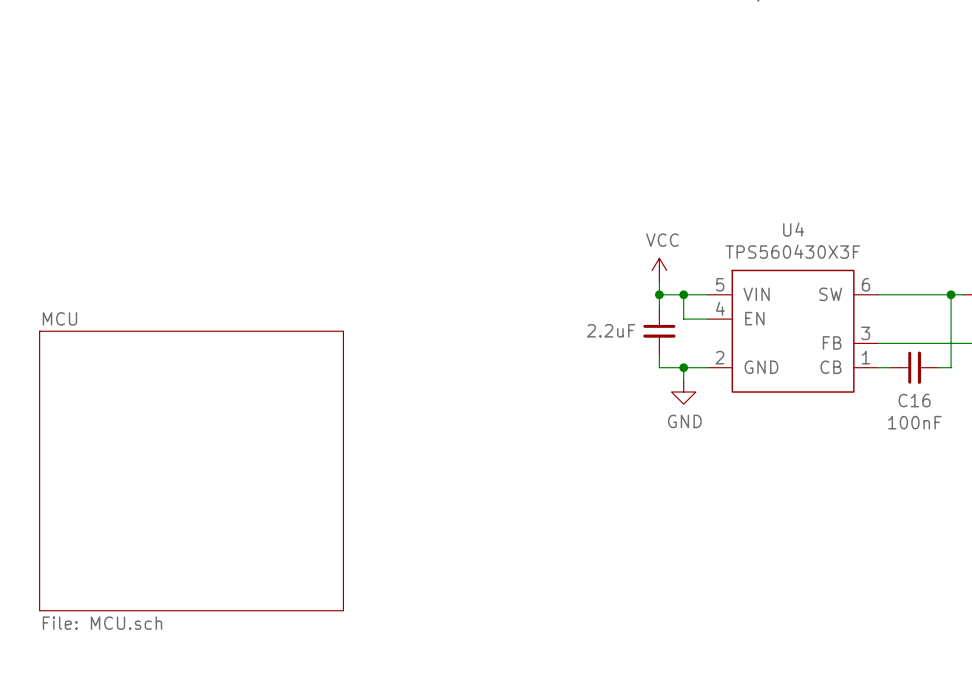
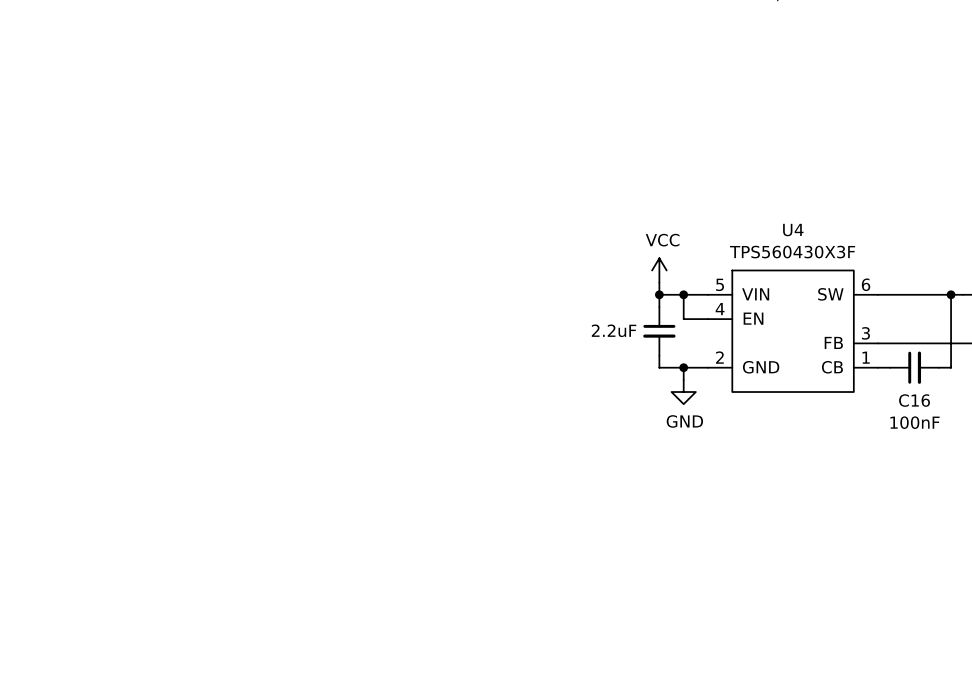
sheet MCU: File: MCU.sch (191, 471) -> none

